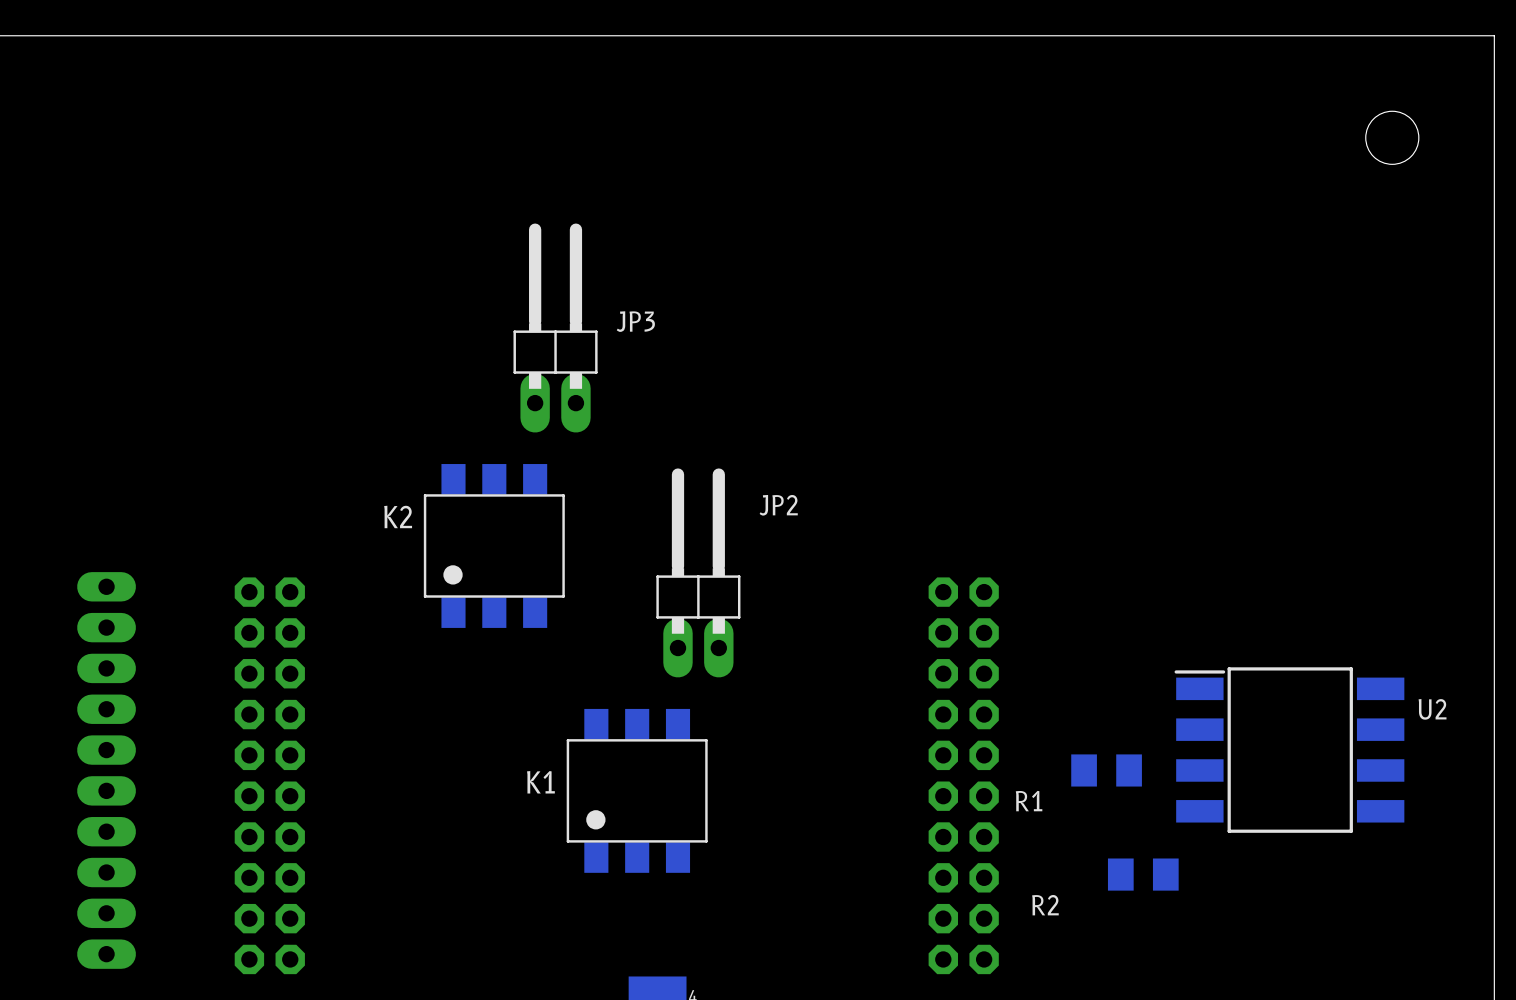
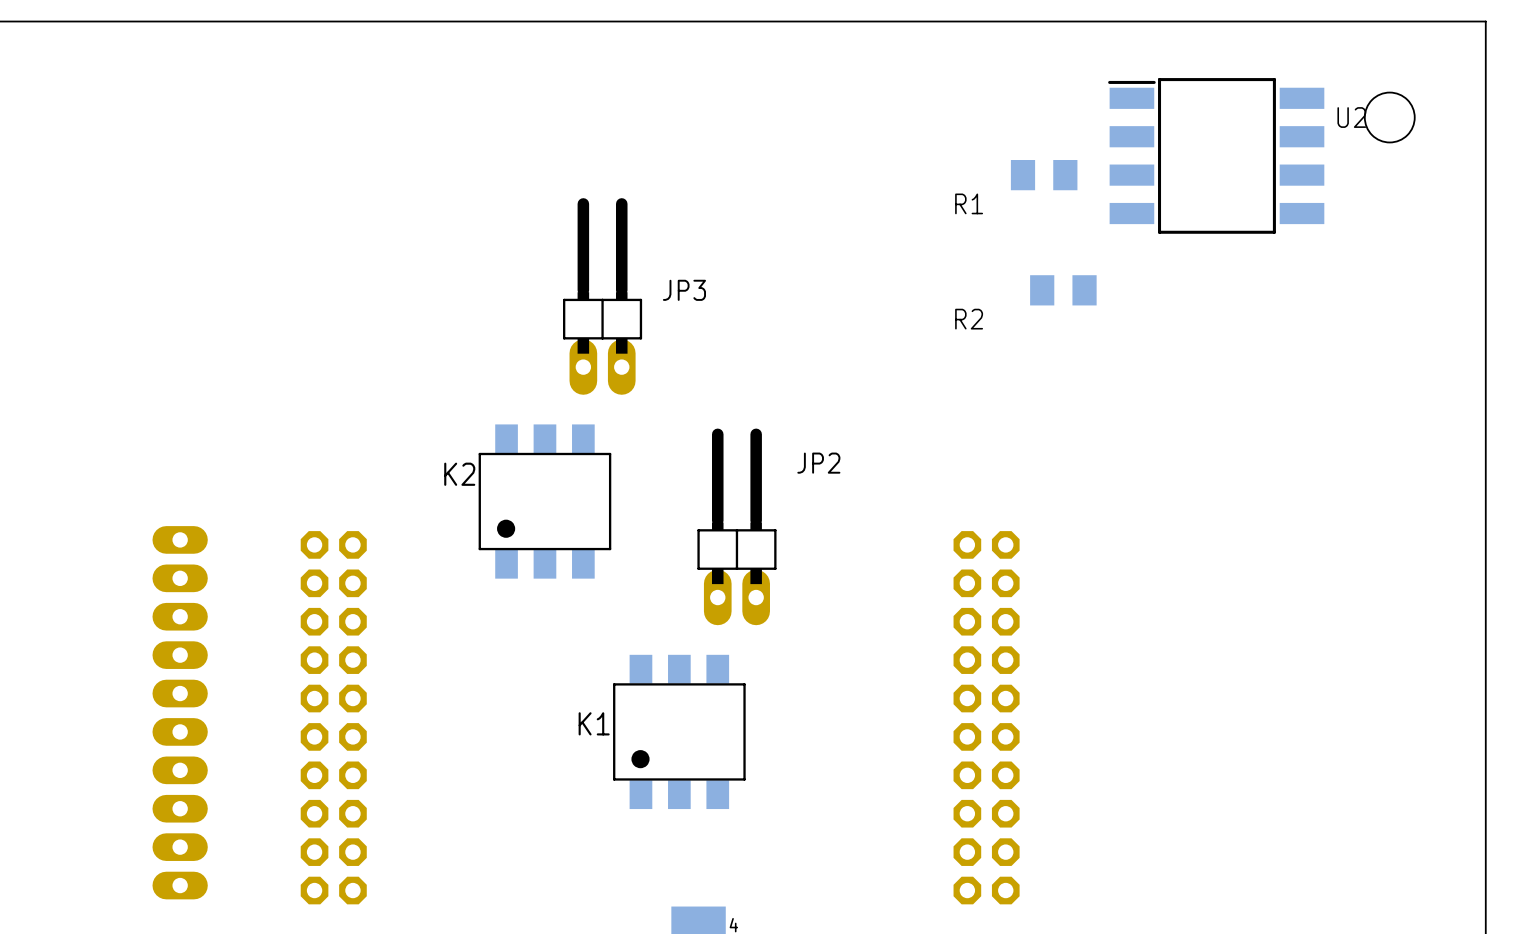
U2 position: (1289, 750) -> (1216, 155)
R1 position: (1106, 770) -> (1044, 175)
R2 position: (1143, 874) -> (1063, 290)

